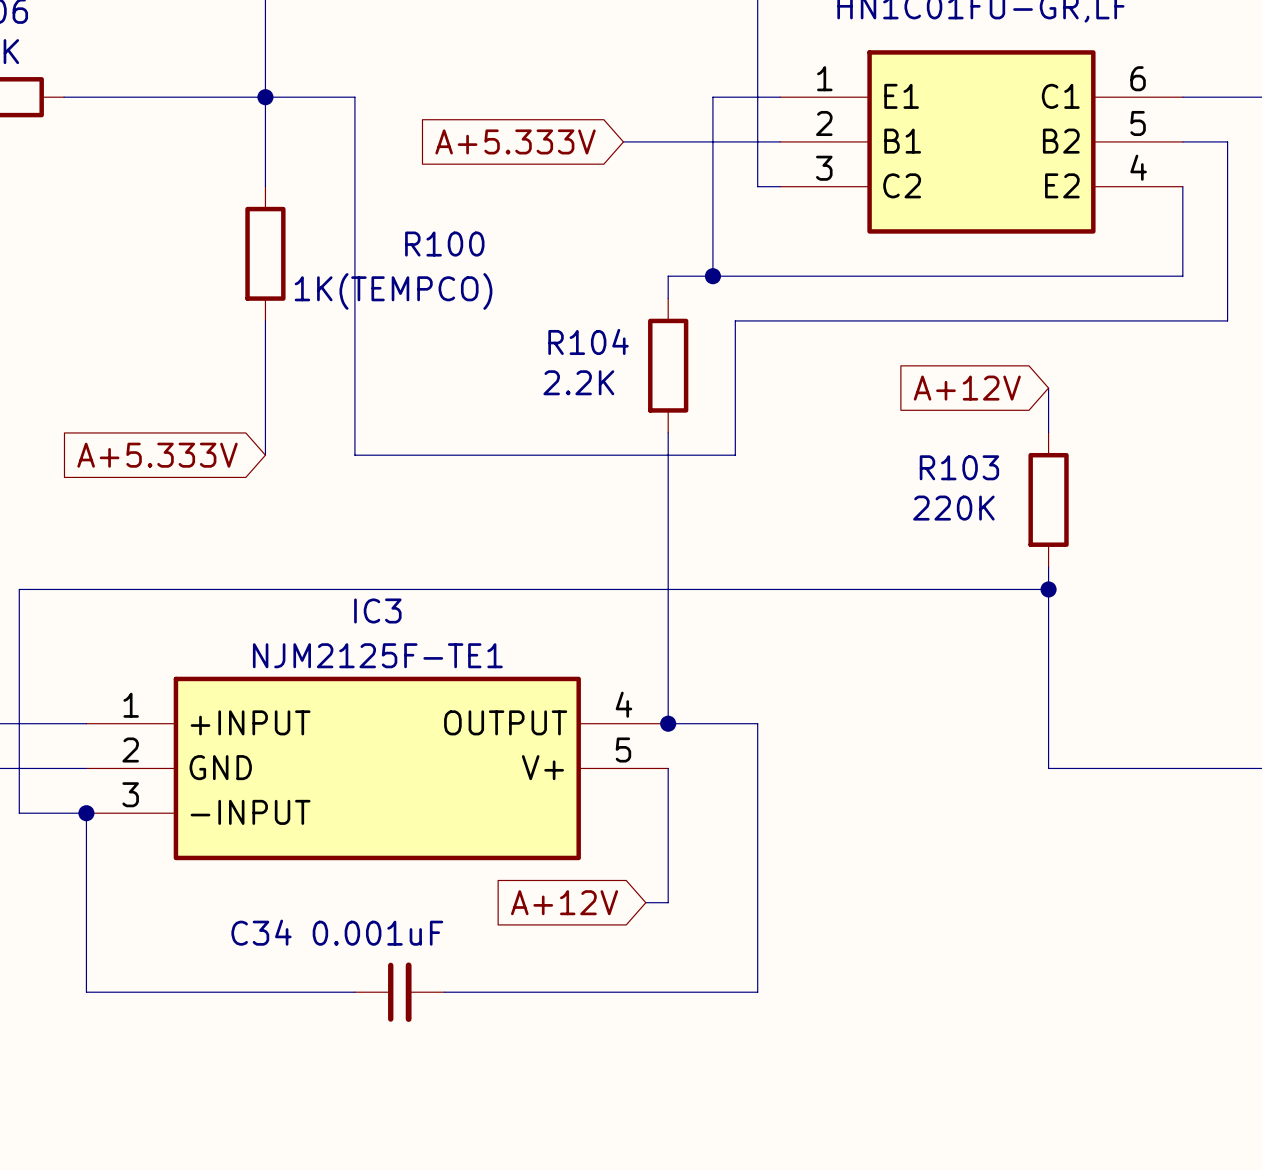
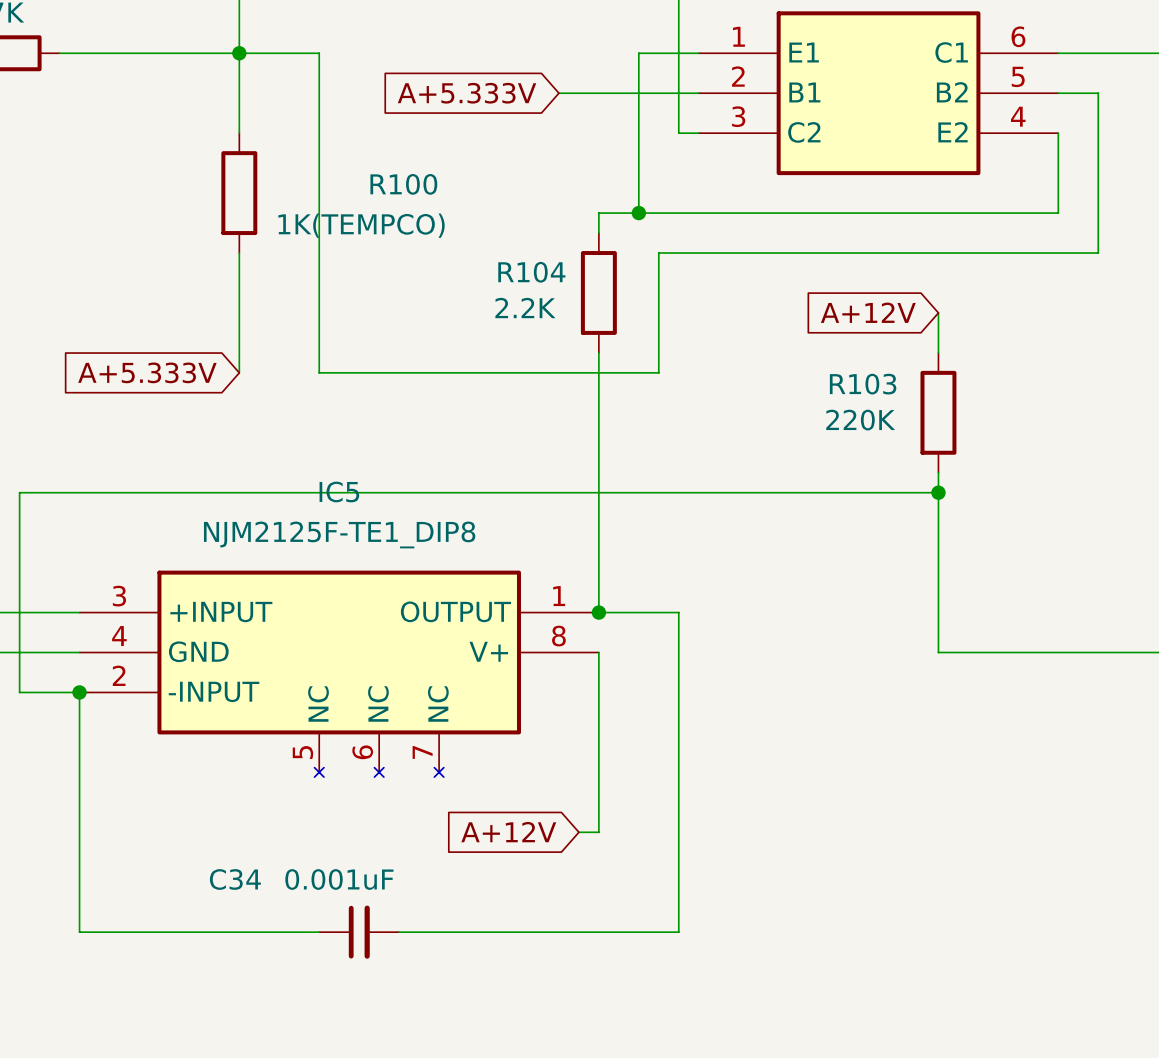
IC3: NJM2125F-TE1 (377, 768) -> none
IC5: none -> NJM2125F-TE1_DIP8 (339, 673)
global label position: A+12V (564, 902) -> A+12V (508, 832)
wire: (645, 902) (668, 902) -> (578, 832) (598, 832) (598, 772)
wire: (86, 992) (354, 992) -> (79, 852) (79, 932) (319, 932)
C34 position: (399, 992) -> (359, 932)
wire: (444, 992) (757, 992) -> (399, 932) (678, 932) (678, 852)

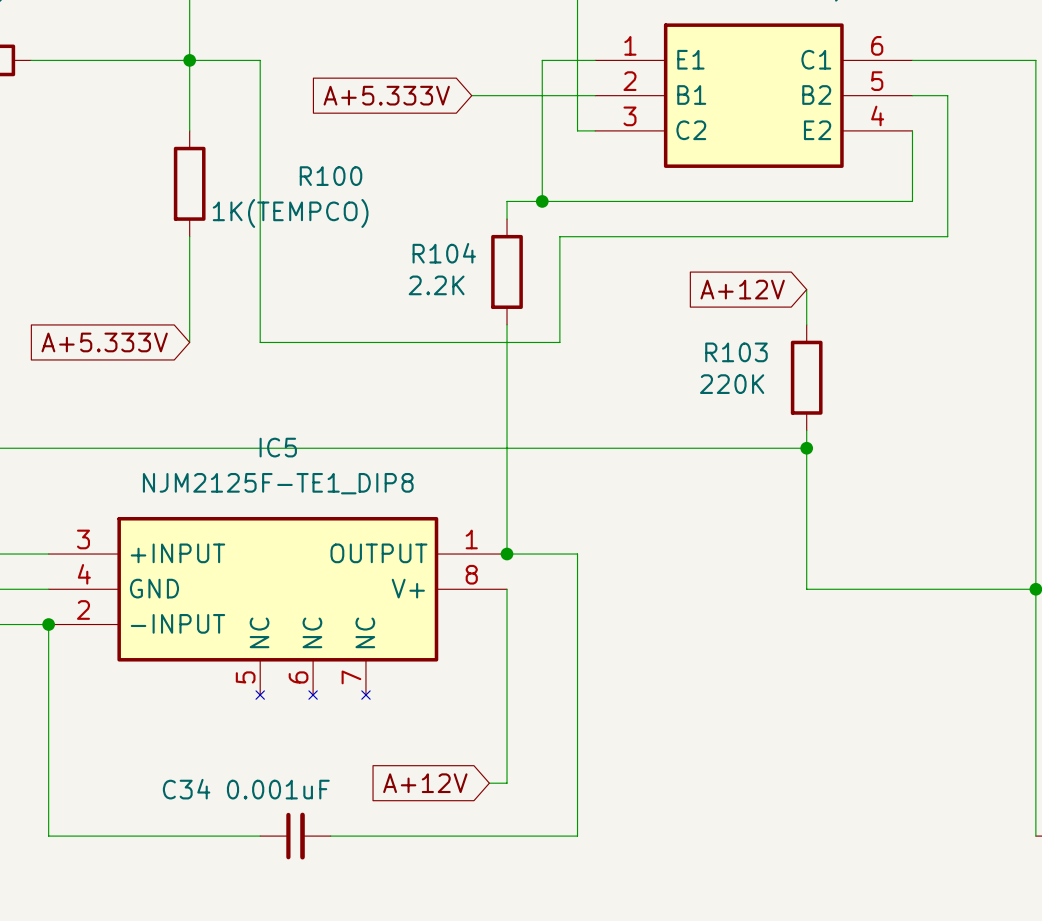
global label position: A+12V (508, 832) -> A+12V (425, 783)
wire: (578, 832) (598, 832) -> (489, 783) (507, 783) (507, 747)

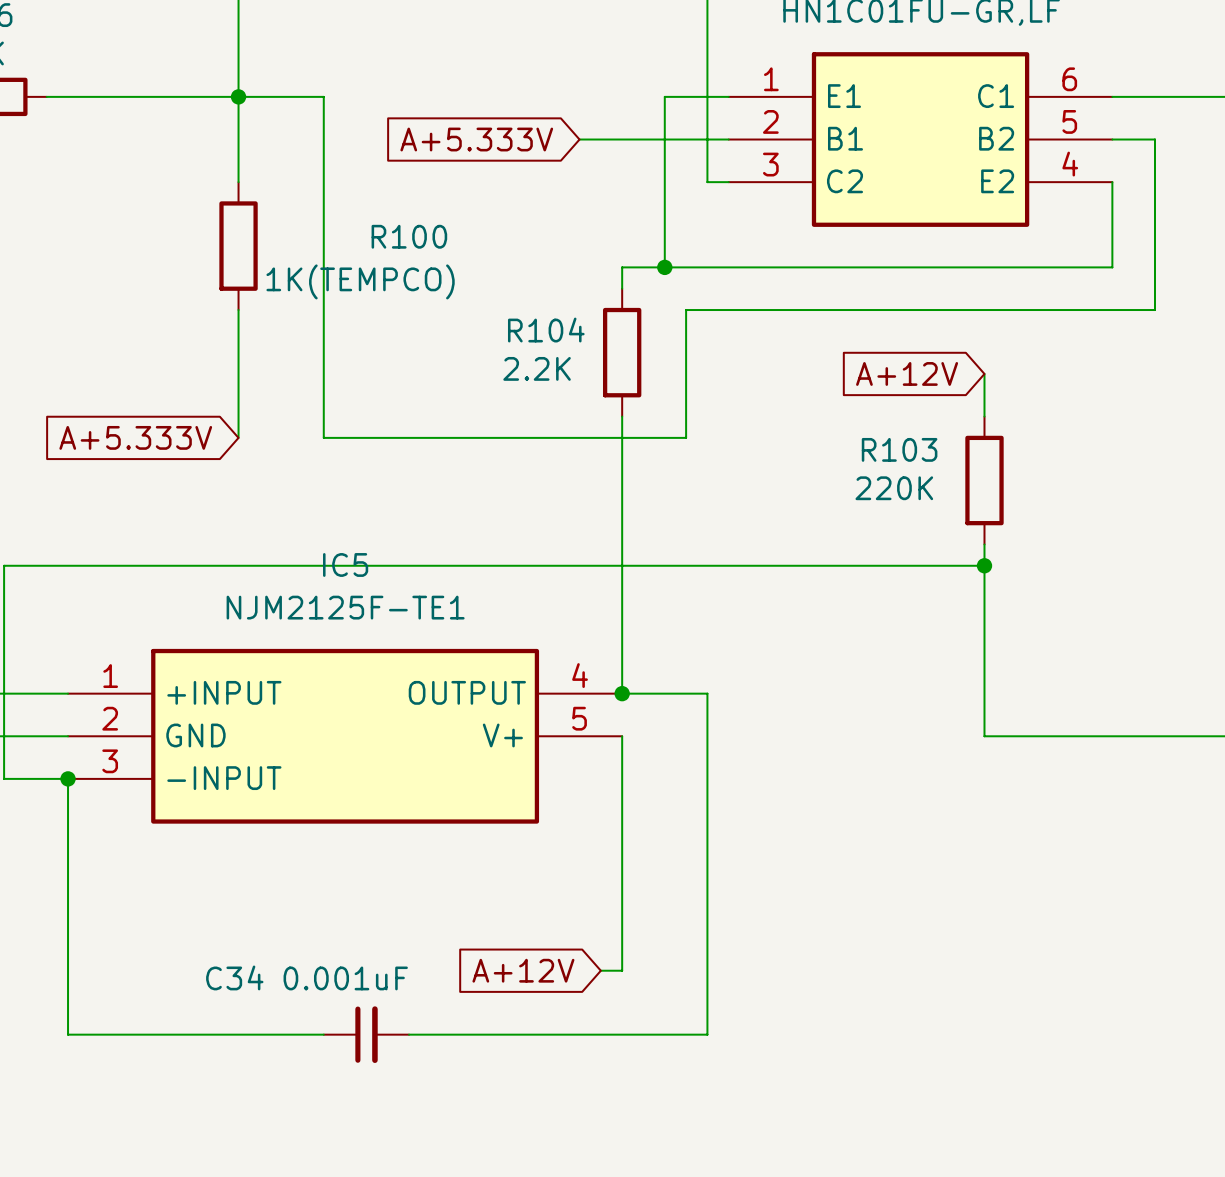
IC5 value: NJM2125F-TE1_DIP8 (278, 483) -> NJM2125F-TE1 (345, 607)
IC5 symbol: [48, 516, 508, 700] -> [68, 648, 623, 824]

